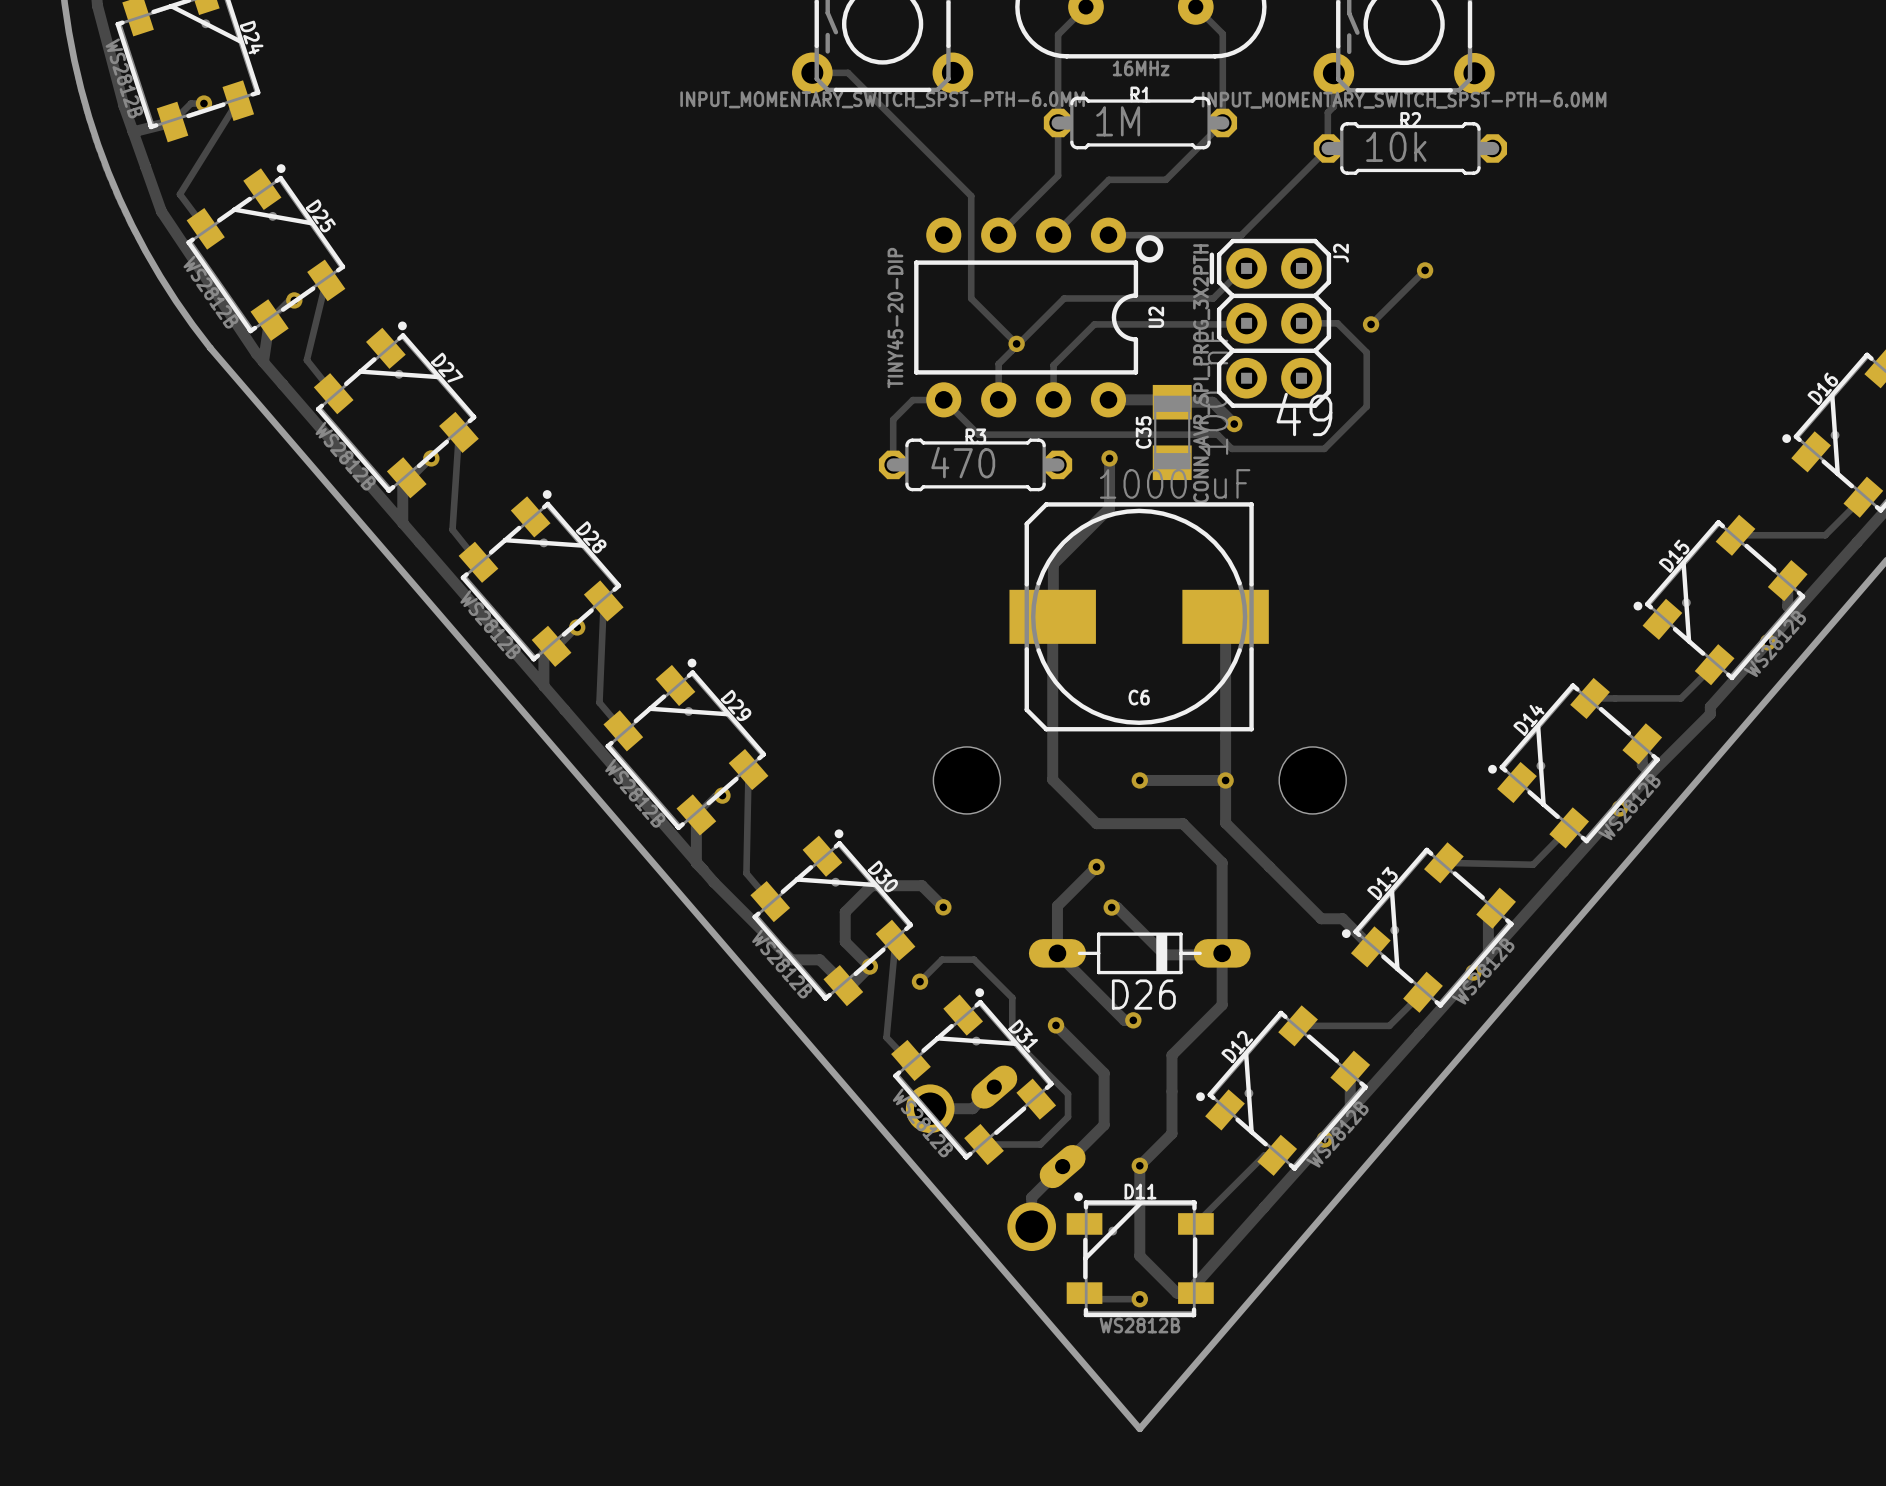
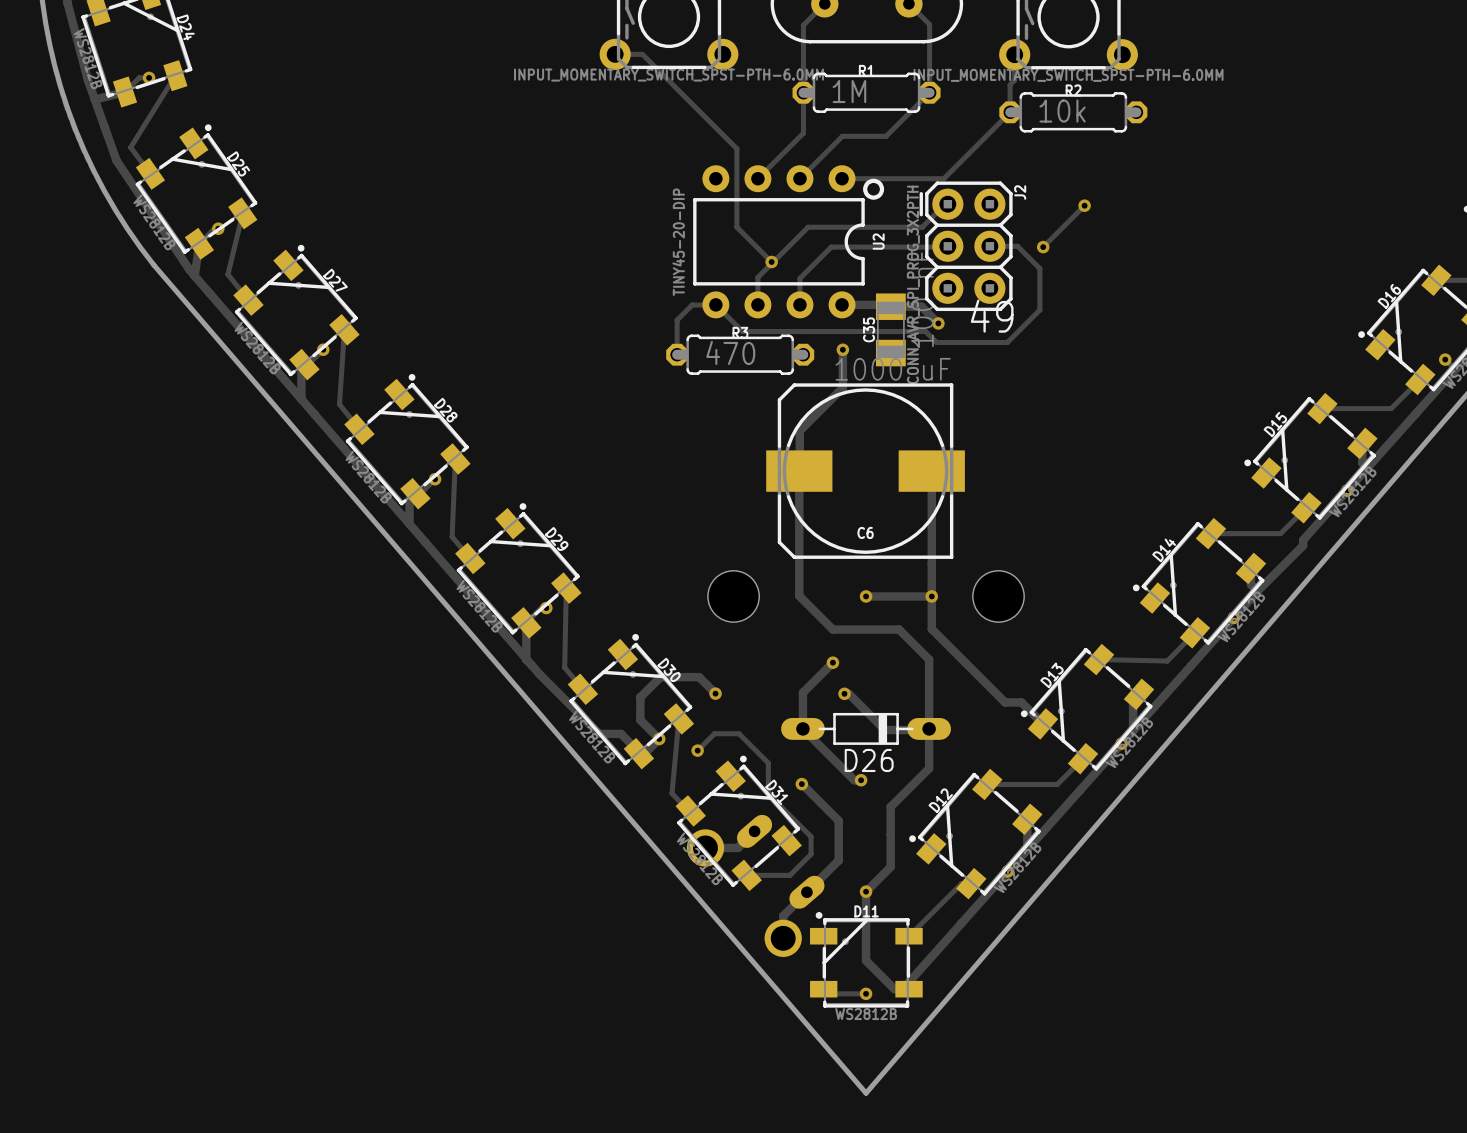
part value: 16MHz (1141, 68) -> none

